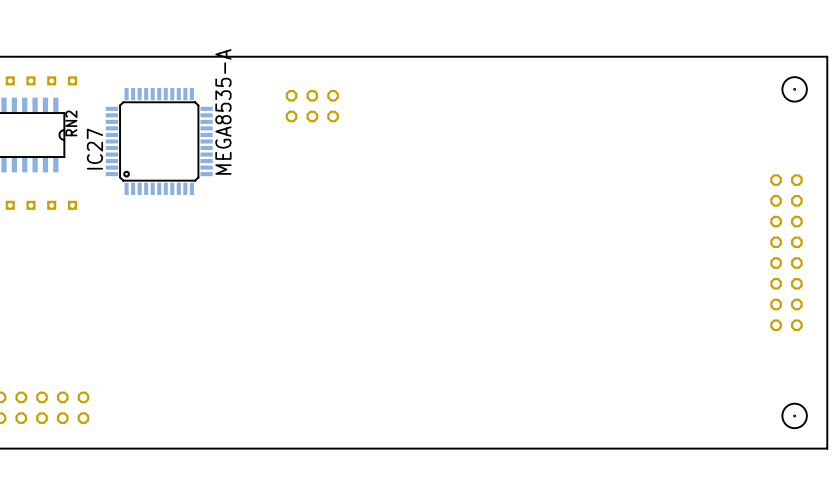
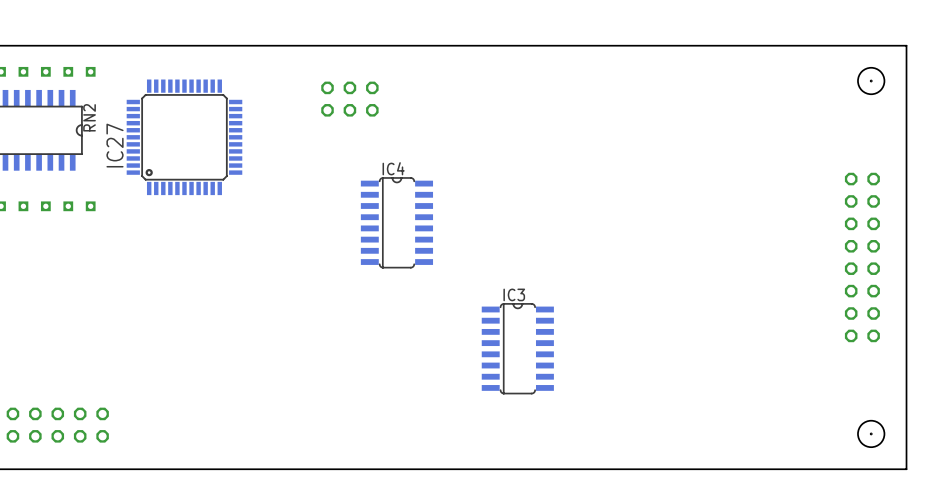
IC27 value: MEGA8535-A (223, 111) -> none
IC4: none -> (396, 222)
IC3: none -> (517, 348)

